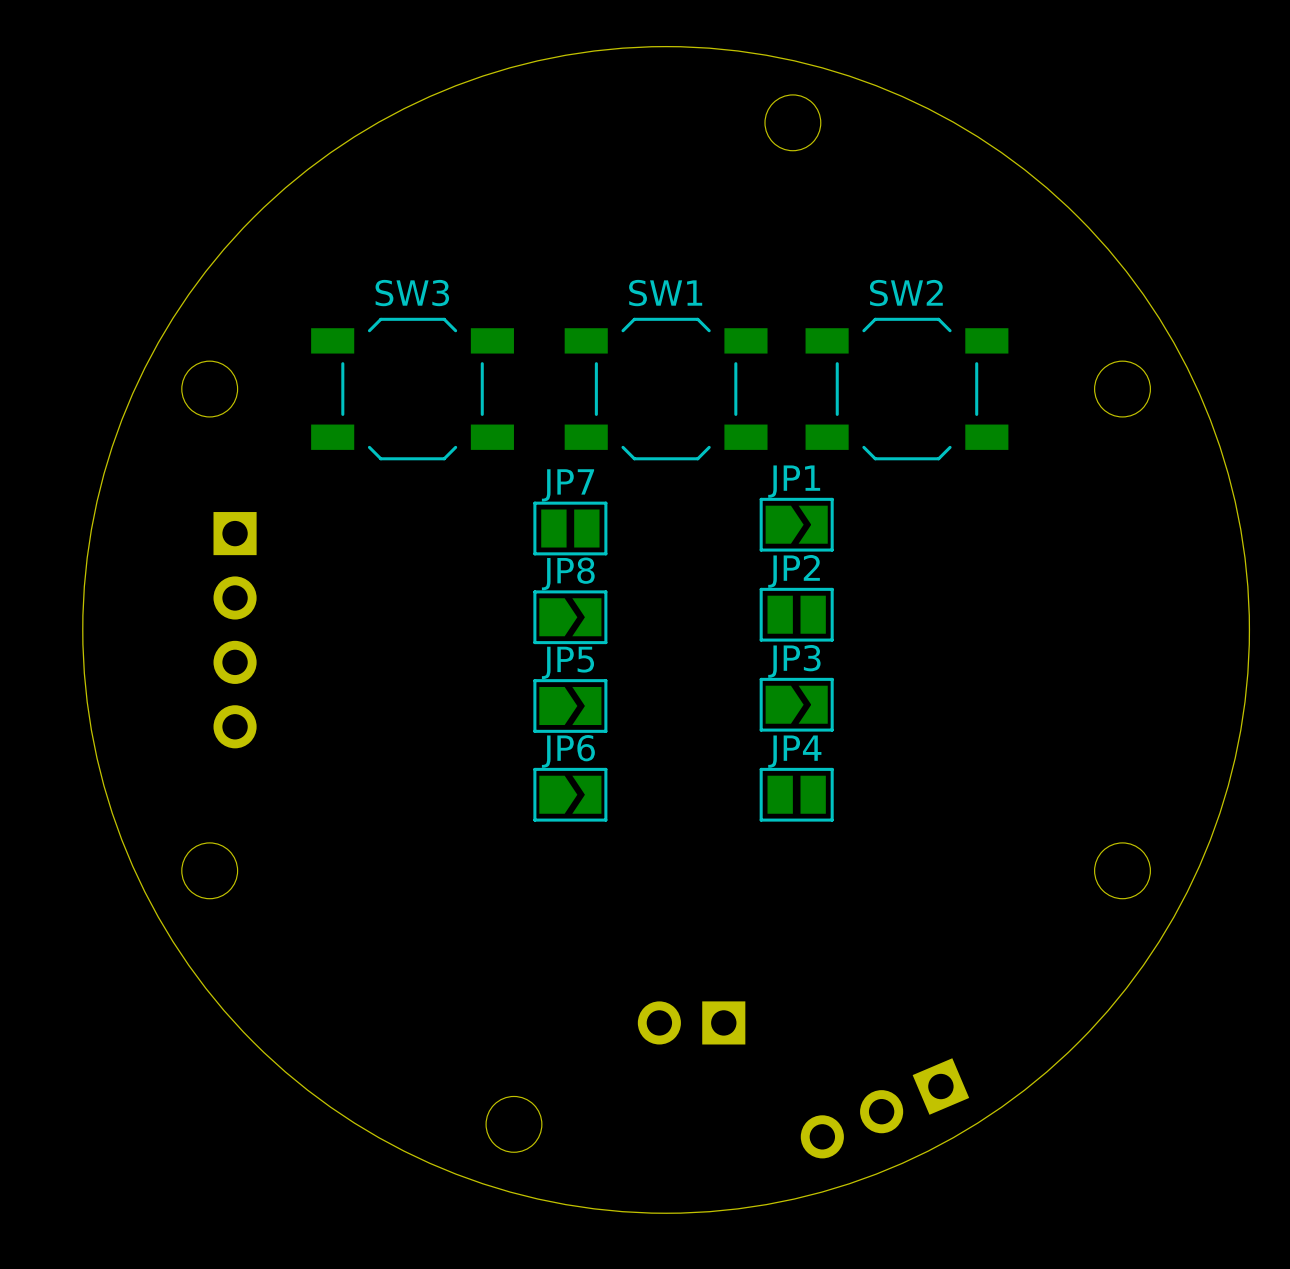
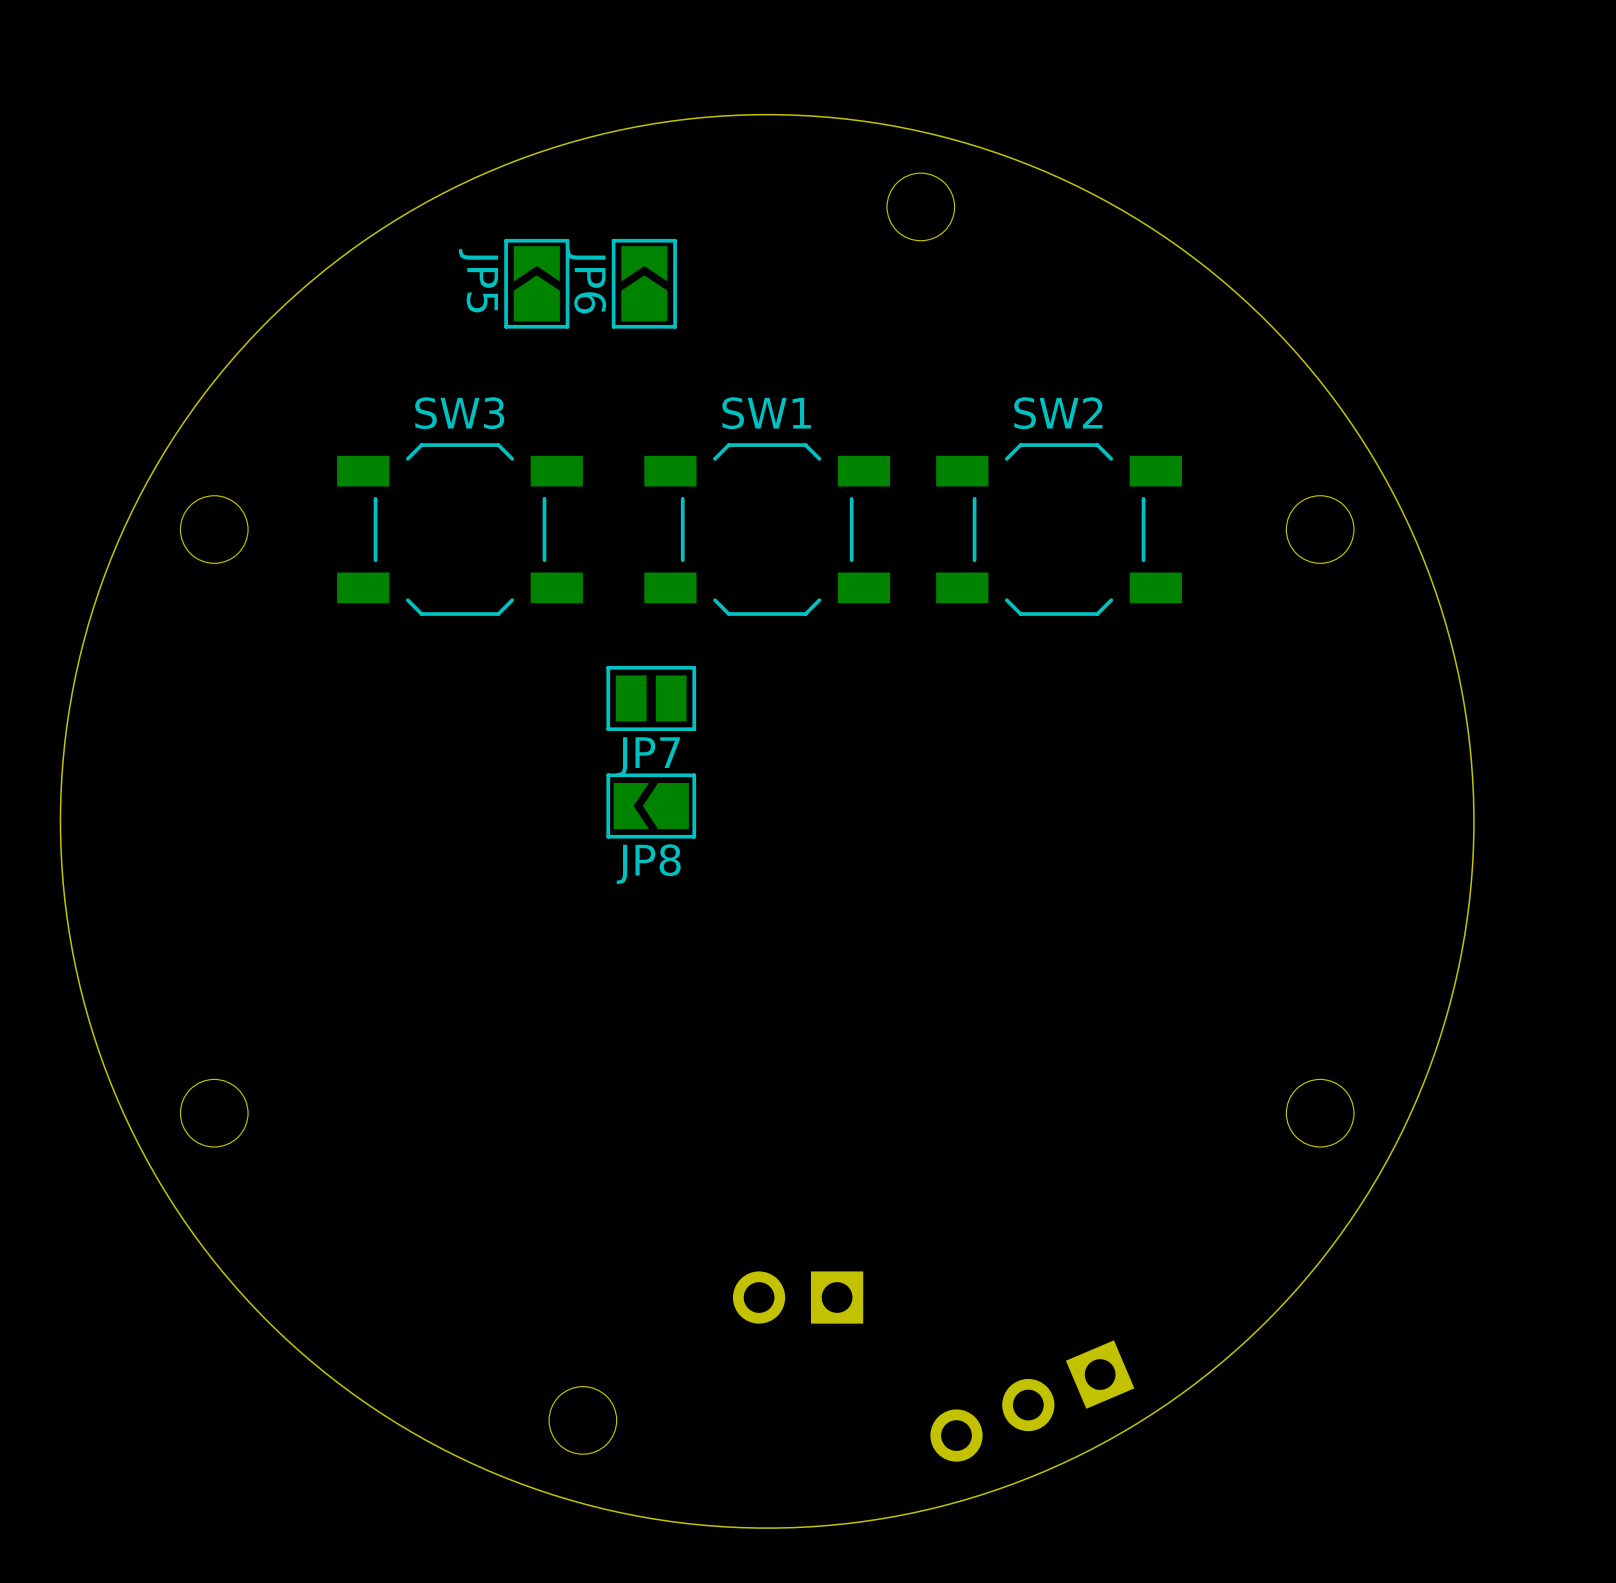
JP7 name position: JP7 (568, 485) -> JP7 (648, 756)
JP1: (796, 524) -> none
JP2: (796, 614) -> none
JP8 rotation: 0° (570, 617) -> 180° (651, 806)
part: (235, 630) -> none
JP3: (796, 704) -> none
JP5 rotation: 0° (570, 705) -> 90° counterclockwise (536, 283)
JP5 position: (570, 705) -> (536, 283)
JP6 rotation: 0° (570, 794) -> 90° counterclockwise (644, 283)
JP6 position: (570, 794) -> (644, 283)
JP4: (796, 794) -> none

